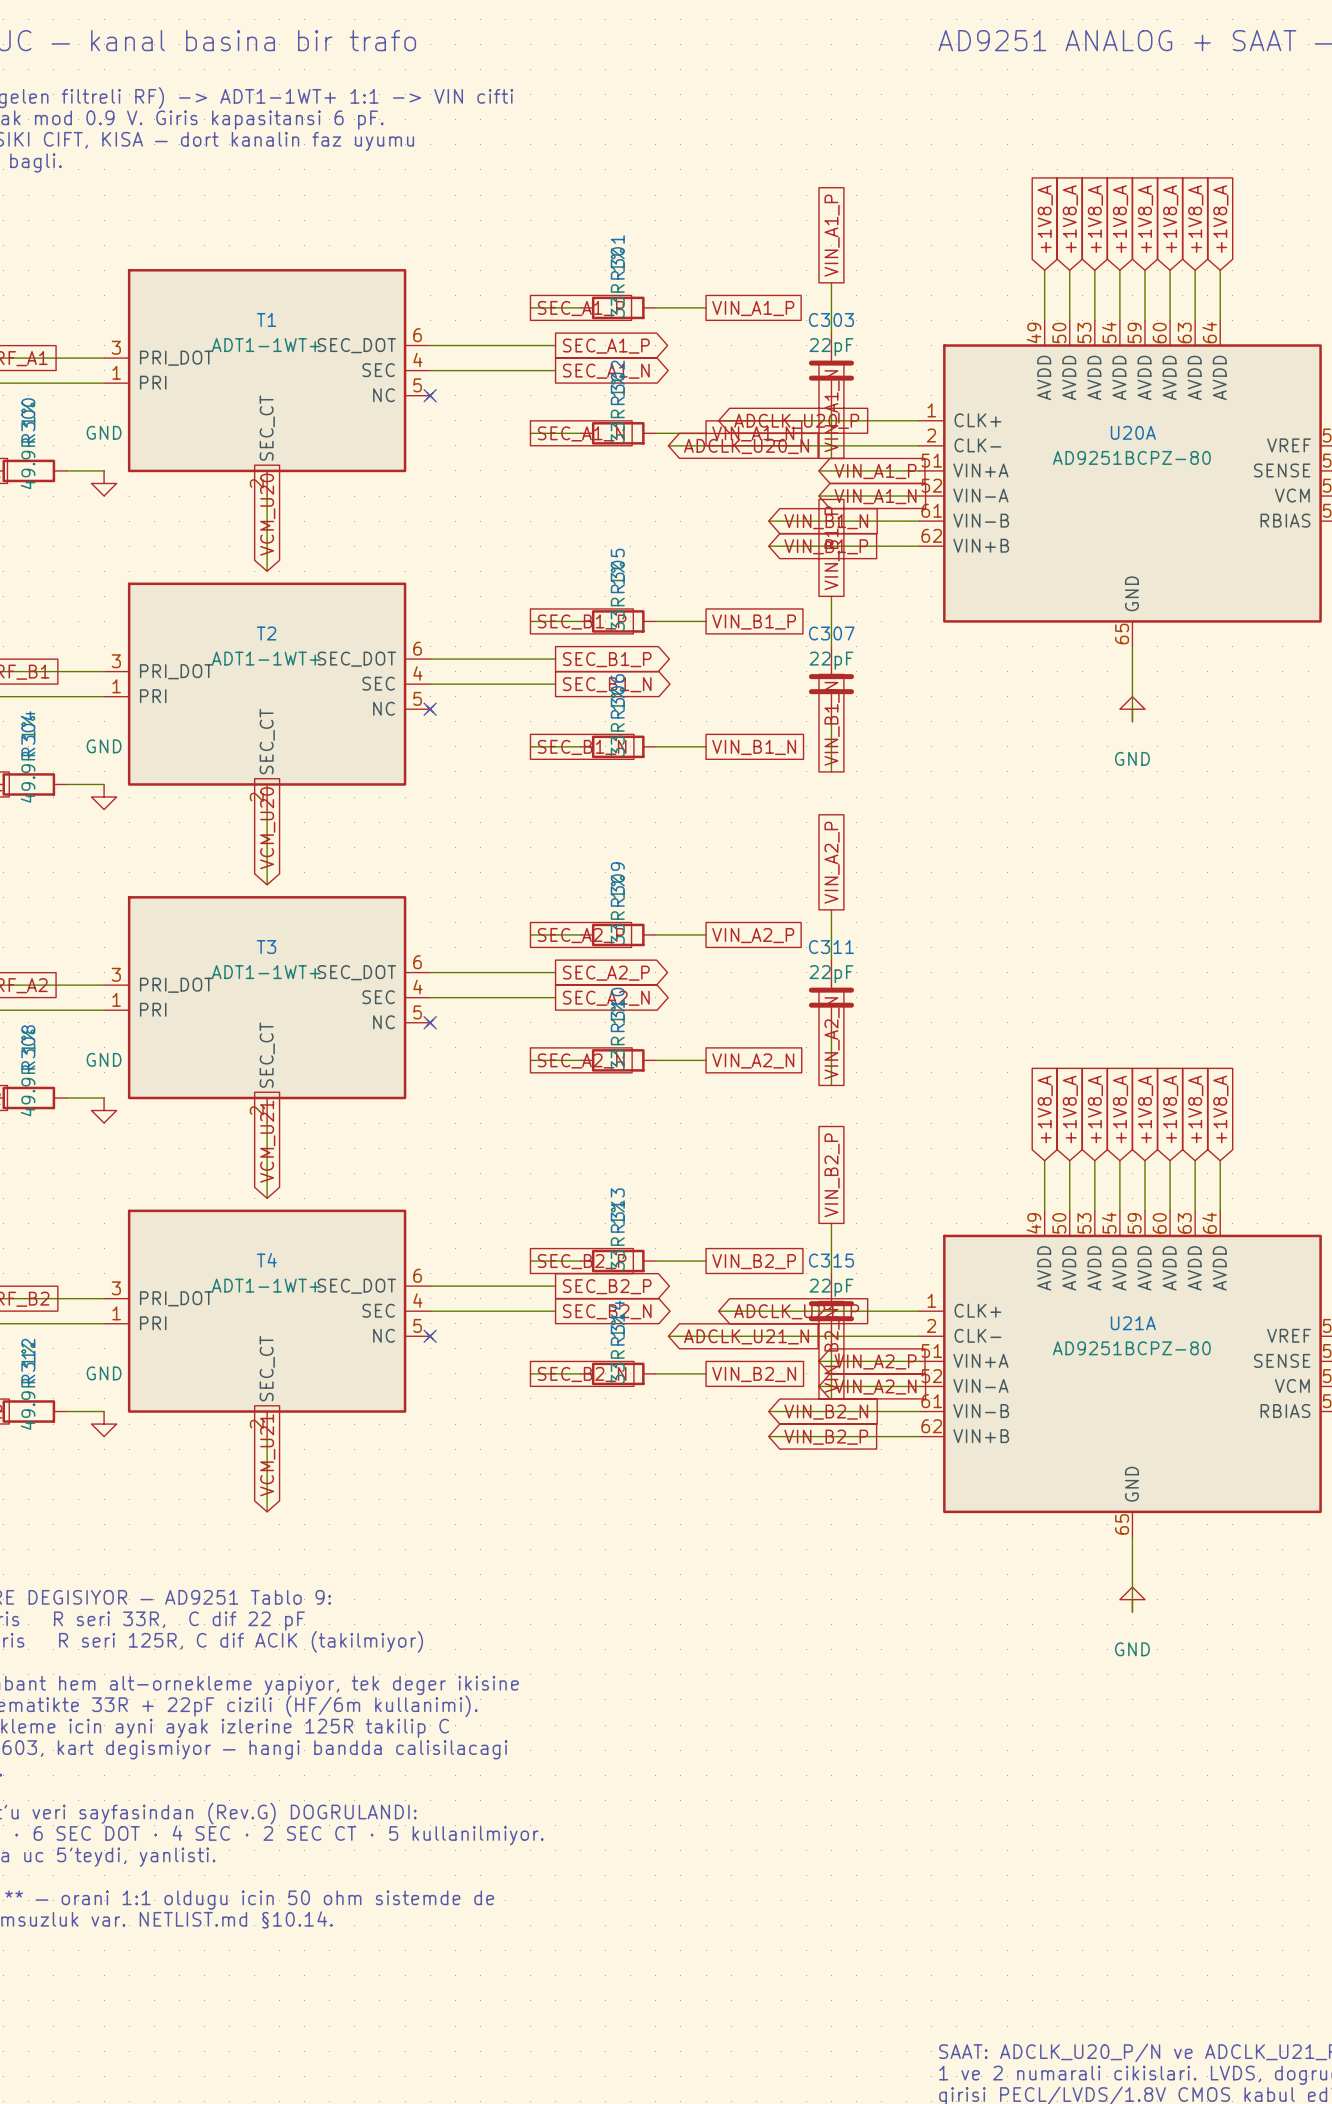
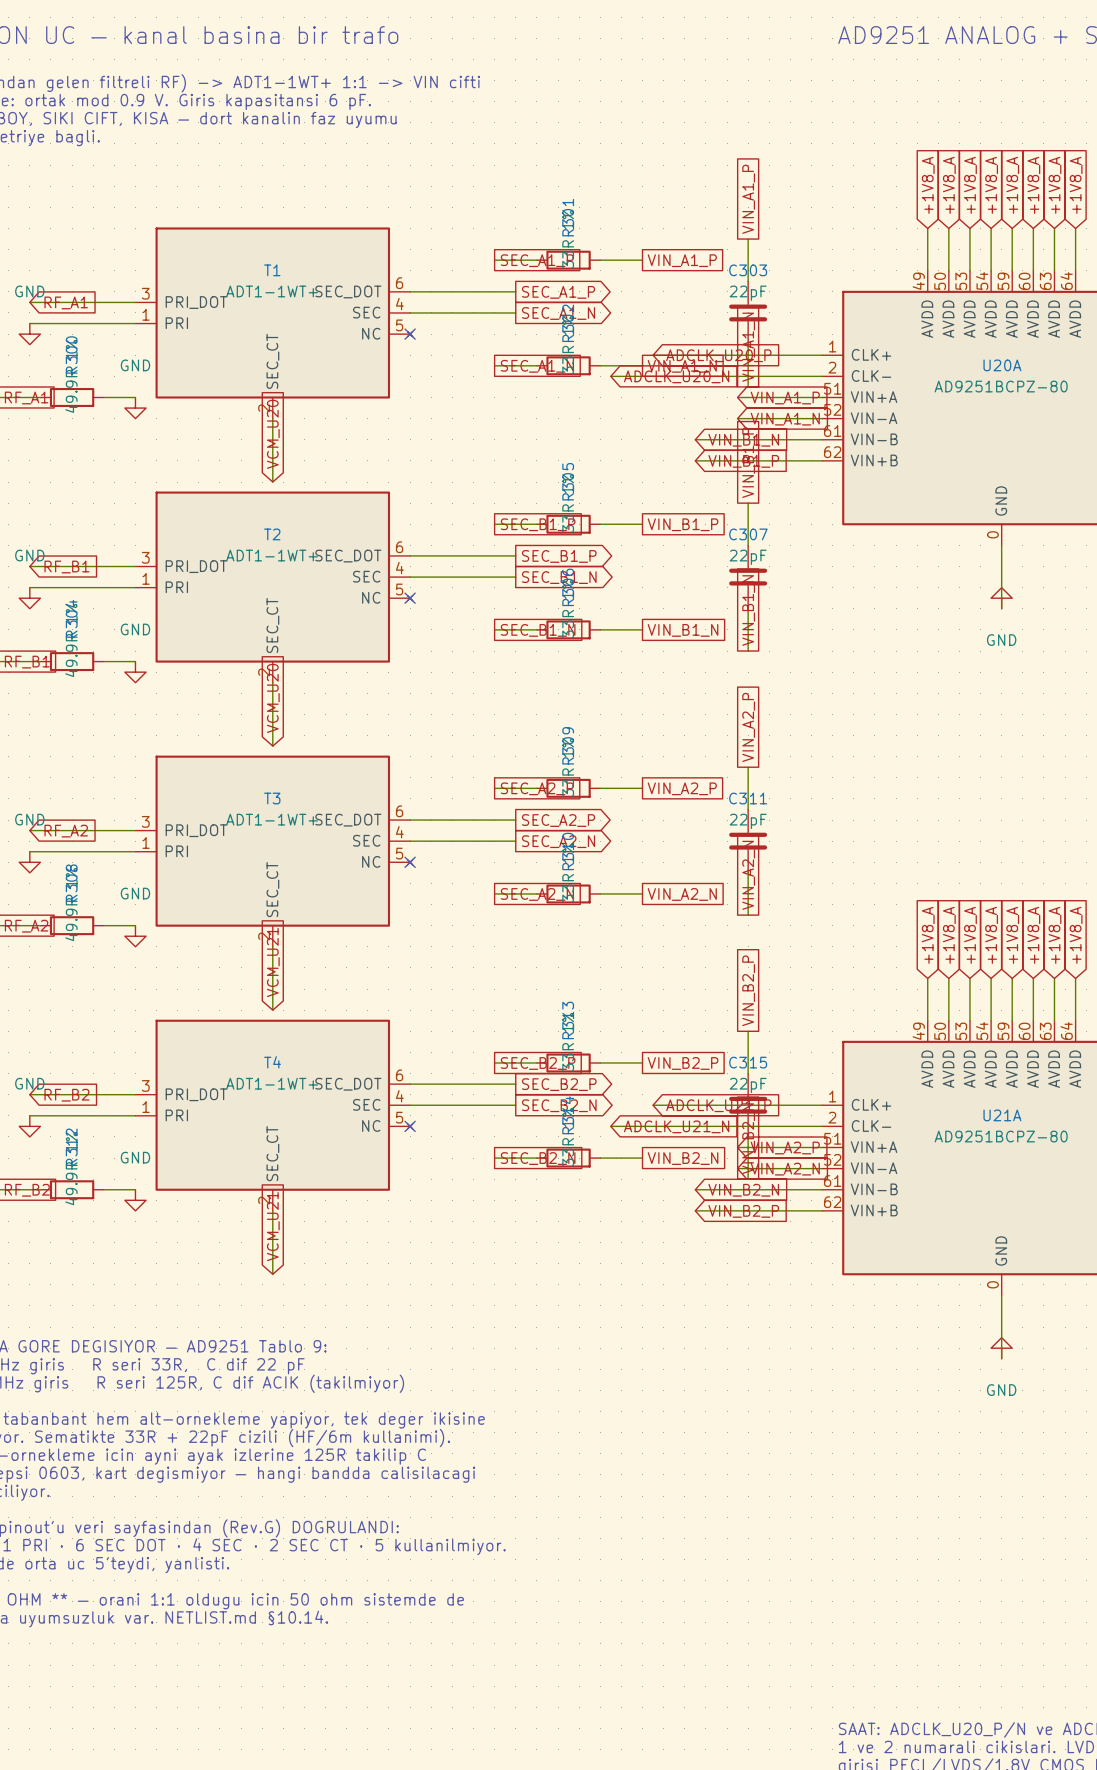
U20A pin number: 65 (1122, 633) -> 0 (992, 534)
U21A pin number: 65 (1122, 1524) -> 0 (992, 1284)

